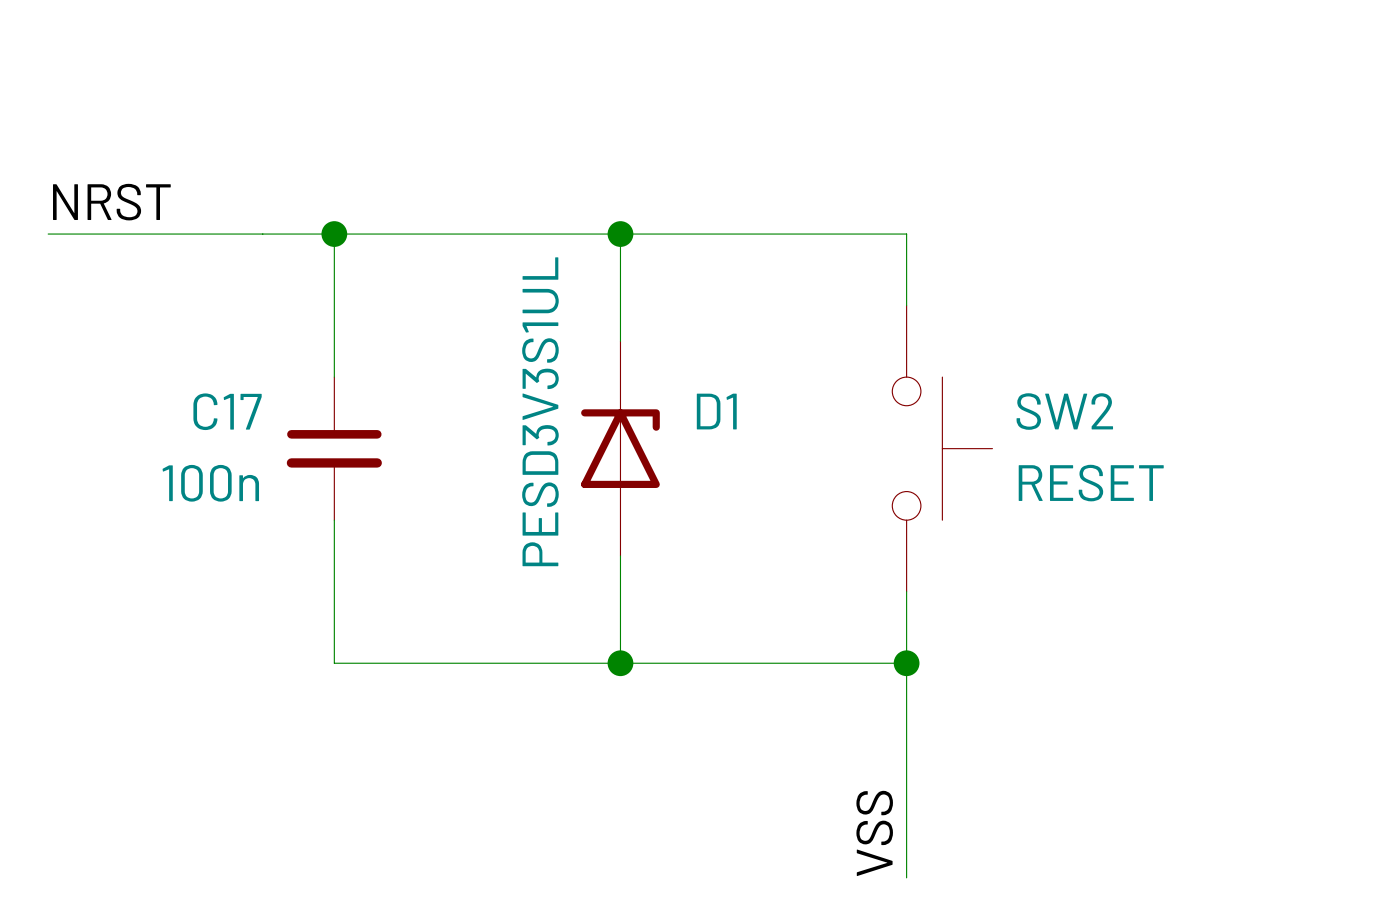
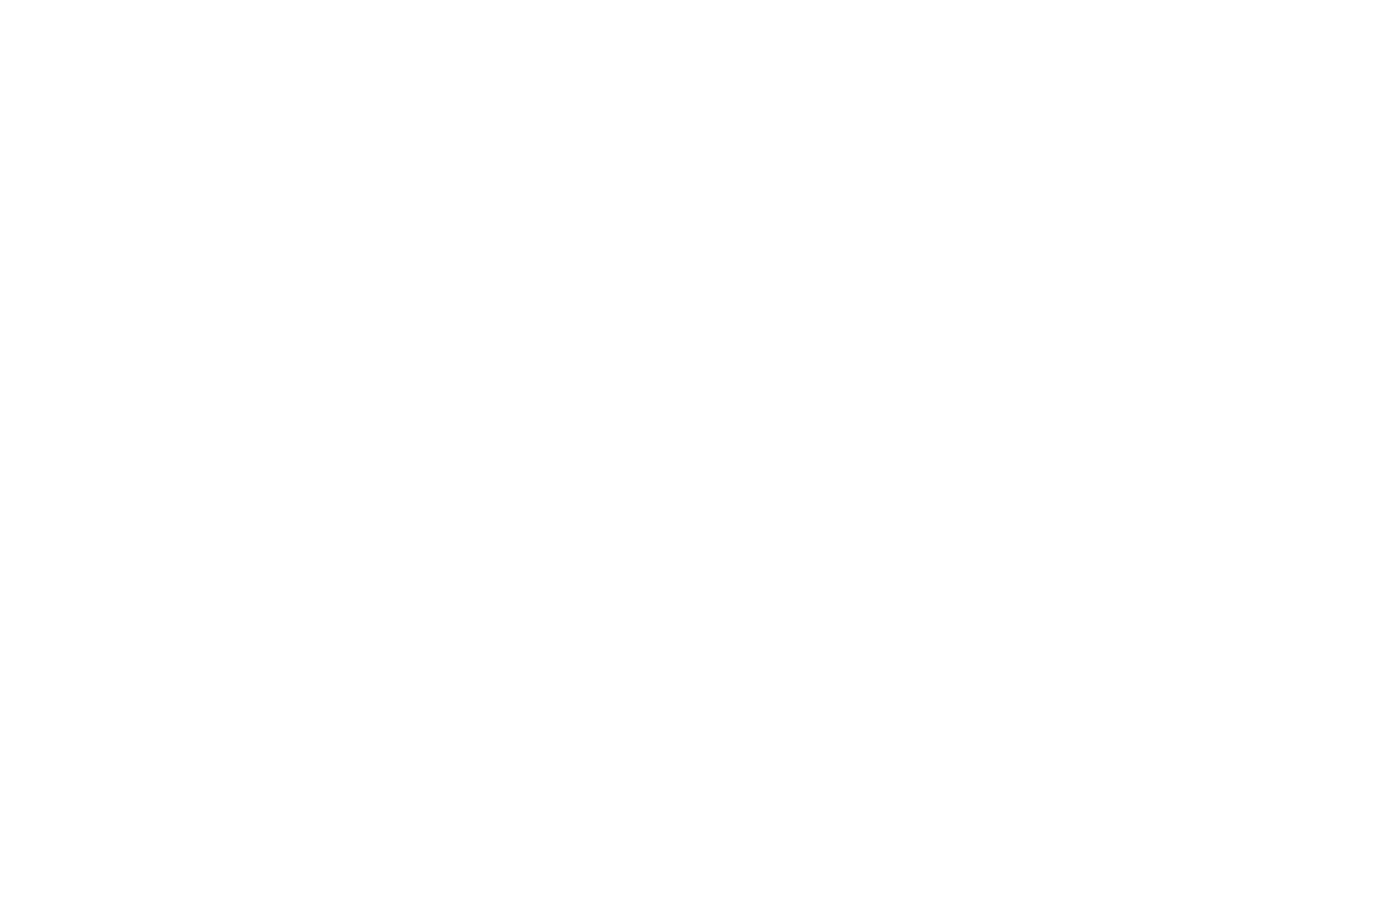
label: NRST (111, 202) -> none
wire: (48, 234) (906, 234) (906, 305) -> none
wire: (334, 234) (334, 377) -> none
junction: (334, 234) -> none
wire: (620, 234) (620, 341) -> none
junction: (620, 234) -> none
C17: 100n (334, 448) -> none
D1: PESD3V3S1UL (620, 448) -> none
SW2: RESET (942, 448) -> none
wire: (334, 520) (334, 663) (906, 663) -> none
wire: (620, 555) (620, 663) -> none
wire: (906, 591) (906, 877) -> none
junction: (620, 663) -> none
junction: (906, 663) -> none
label: VSS (874, 833) -> none

